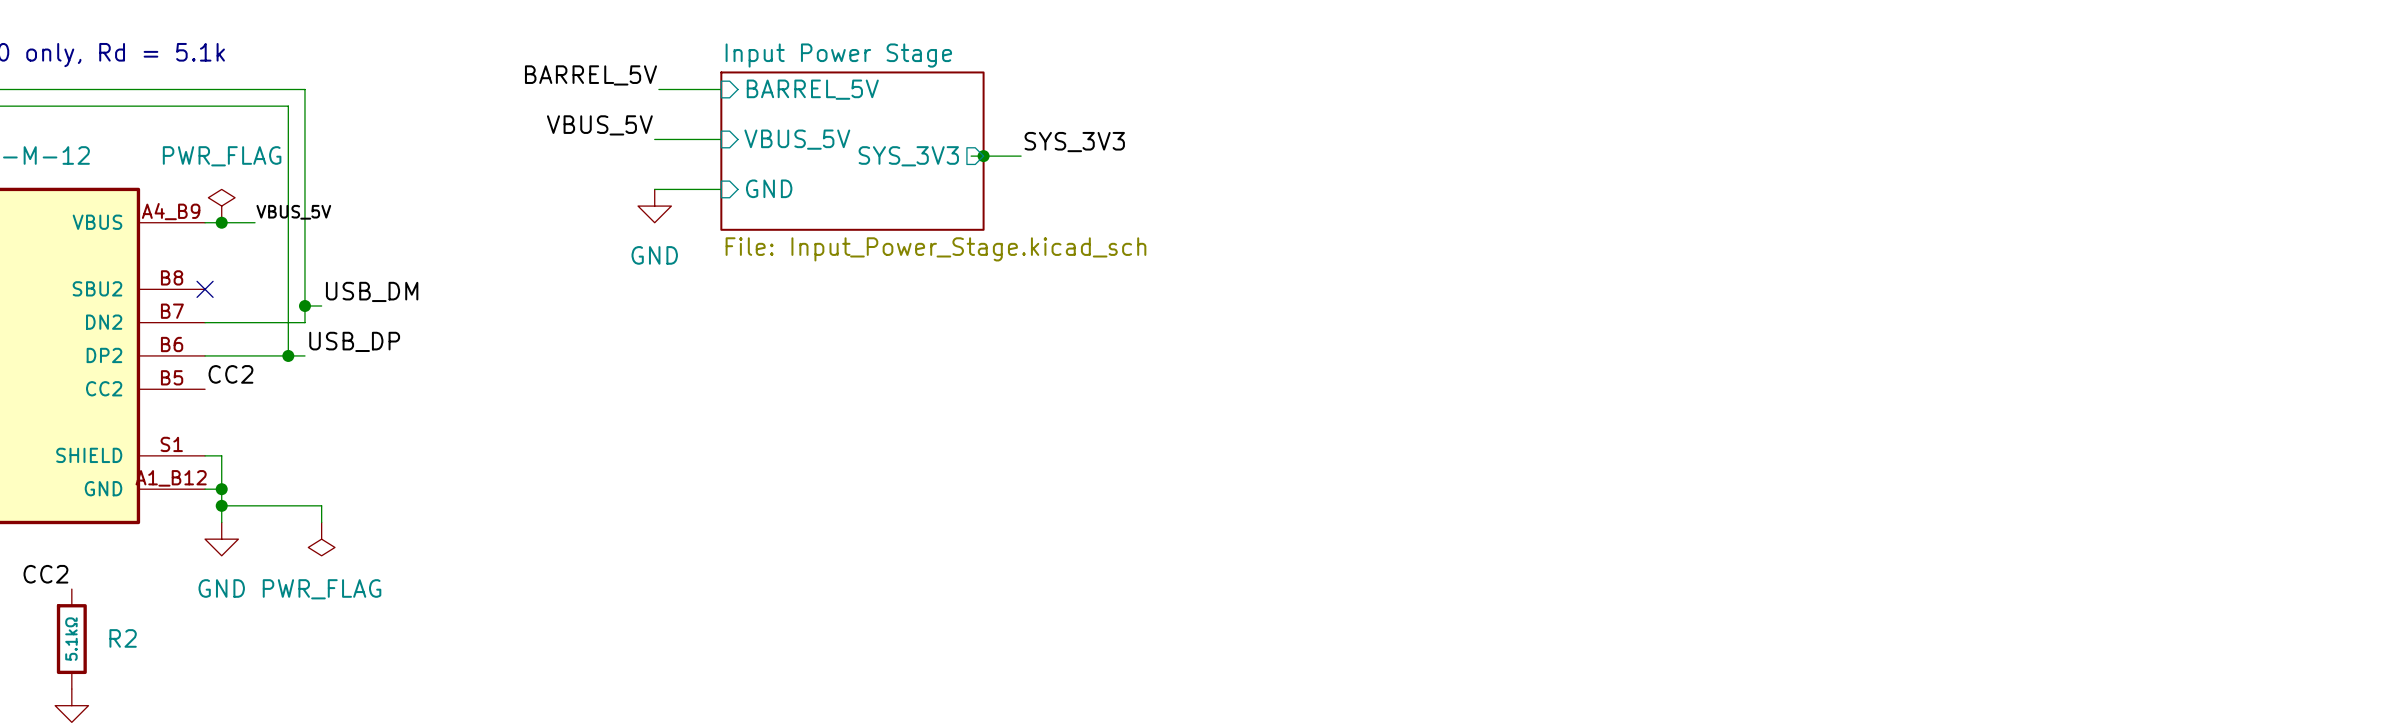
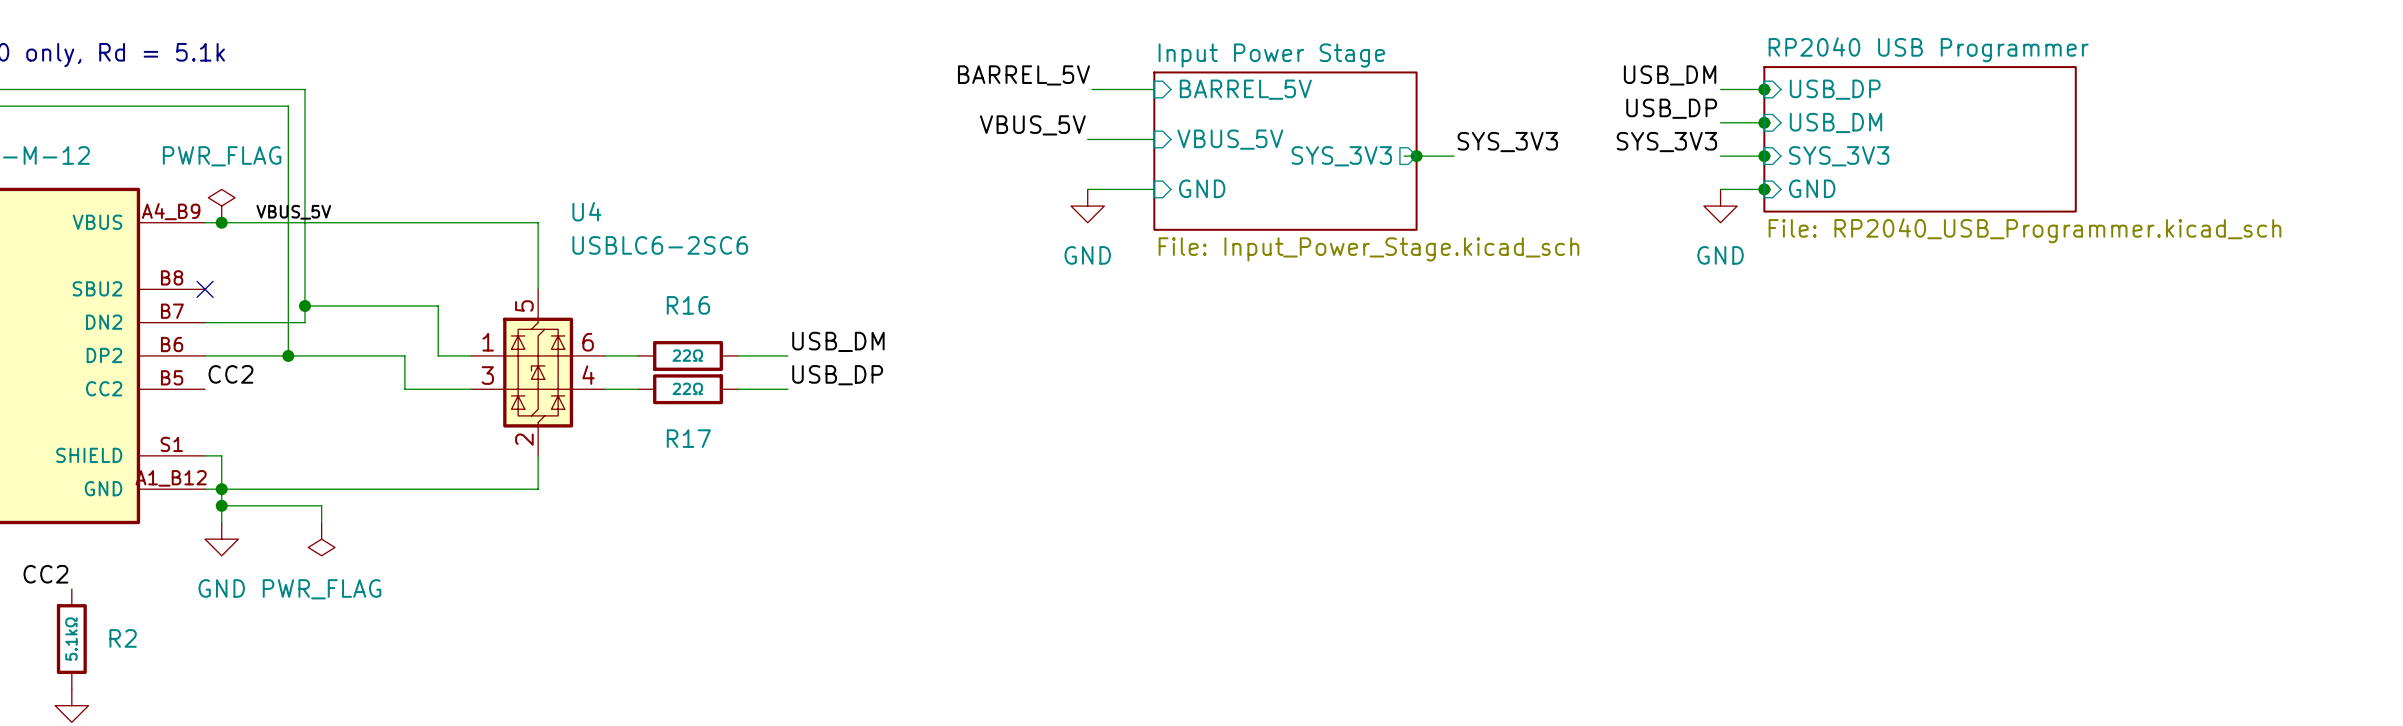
label: BARREL_5V (590, 75) -> none
label: none -> BARREL_5V (1023, 75)
label: none -> USB_DM (1670, 75)
wire: (658, 89) (721, 89) -> none
sheet pin: BARREL_5V (812, 89) -> none
wire: none -> (1091, 89) (1154, 89)
sheet pin: none -> BARREL_5V (1245, 89)
wire: none -> (1720, 89) (1770, 89)
junction: none -> (1764, 89)
sheet pin: none -> USB_DP (1835, 89)
label: none -> USB_DP (1671, 108)
wire: none -> (1720, 122) (1770, 122)
junction: none -> (1764, 122)
sheet pin: none -> USB_DM (1835, 122)
label: VBUS_5V (599, 125) -> none
label: none -> VBUS_5V (1032, 125)
wire: (654, 139) (721, 139) -> none
sheet pin: VBUS_5V (797, 139) -> none
wire: none -> (1087, 139) (1154, 139)
sheet pin: none -> VBUS_5V (1230, 139)
sheet RP2040 USB Programmer: none -> File: RP2040_USB_Programmer.kicad_sch (1920, 139)
label: SYS_3V3 (1074, 142) -> none
label: none -> SYS_3V3 (1507, 142)
label: none -> SYS_3V3 (1666, 142)
sheet Input Power Stage: File: Input_Power_Stage.kicad_sch (852, 151) -> none
sheet Input Power Stage: none -> File: Input_Power_Stage.kicad_sch (1285, 151)
sheet pin: SYS_3V3 (908, 156) -> none
wire: (971, 156) (1021, 156) -> (737, 355) (787, 355)
junction: (983, 156) -> none
sheet pin: none -> SYS_3V3 (1341, 156)
wire: none -> (1404, 156) (1454, 156)
junction: none -> (1416, 156)
wire: none -> (1720, 156) (1770, 156)
junction: none -> (1764, 156)
sheet pin: none -> SYS_3V3 (1839, 156)
sheet pin: GND (769, 188) -> none
sheet pin: none -> GND (1202, 188)
sheet pin: none -> GND (1812, 188)
wire: (654, 189) (721, 189) -> none
wire: none -> (1087, 189) (1154, 189)
wire: none -> (1720, 189) (1770, 189)
junction: none -> (1764, 189)
power symbol: GND (654, 206) -> none
power symbol: none -> GND (1087, 206)
power symbol: none -> GND (1720, 206)
wire: none -> (255, 222) (538, 222) (538, 289)
label: USB_DM (372, 291) -> none
wire: none -> (321, 305) (438, 305) (438, 355) (471, 355)
label: USB_DP (354, 341) -> none
label: none -> USB_DM (838, 341)
wire: none -> (304, 355) (404, 355) (404, 389) (471, 389)
wire: none -> (604, 355) (638, 355)
R16: none -> 22Ω (688, 355)
U4: none -> USBLC6-2SC6 (538, 372)
label: none -> USB_DP (837, 375)
wire: none -> (604, 389) (638, 389)
R17: none -> 22Ω (688, 389)
wire: none -> (737, 389) (787, 389)
wire: none -> (538, 455) (538, 489) (221, 489)

